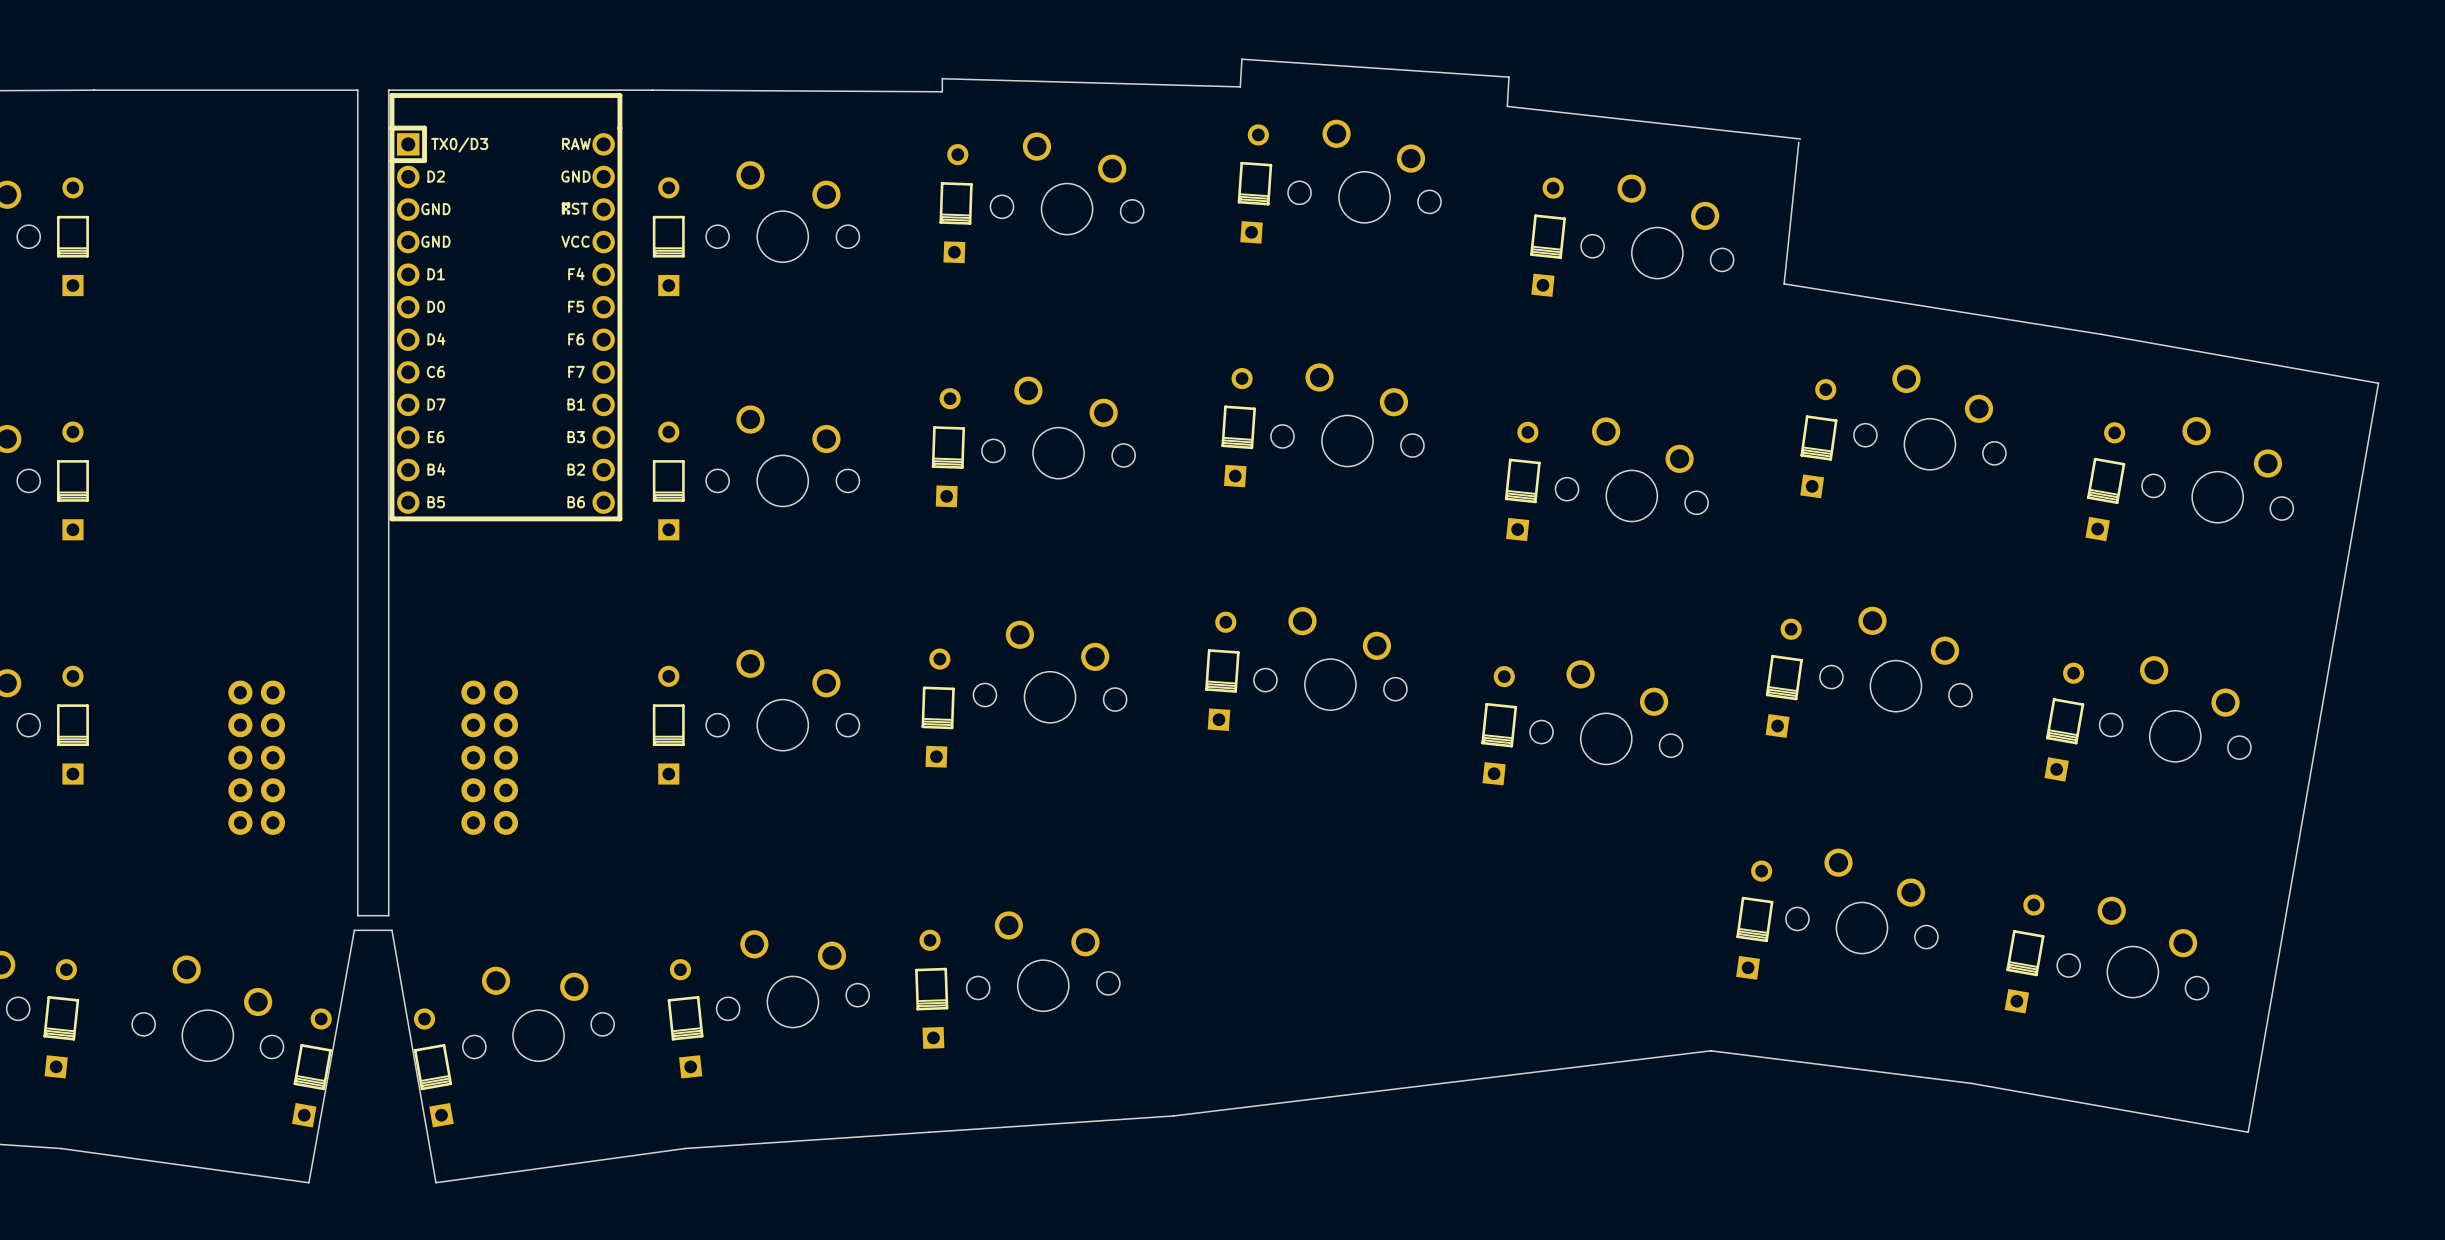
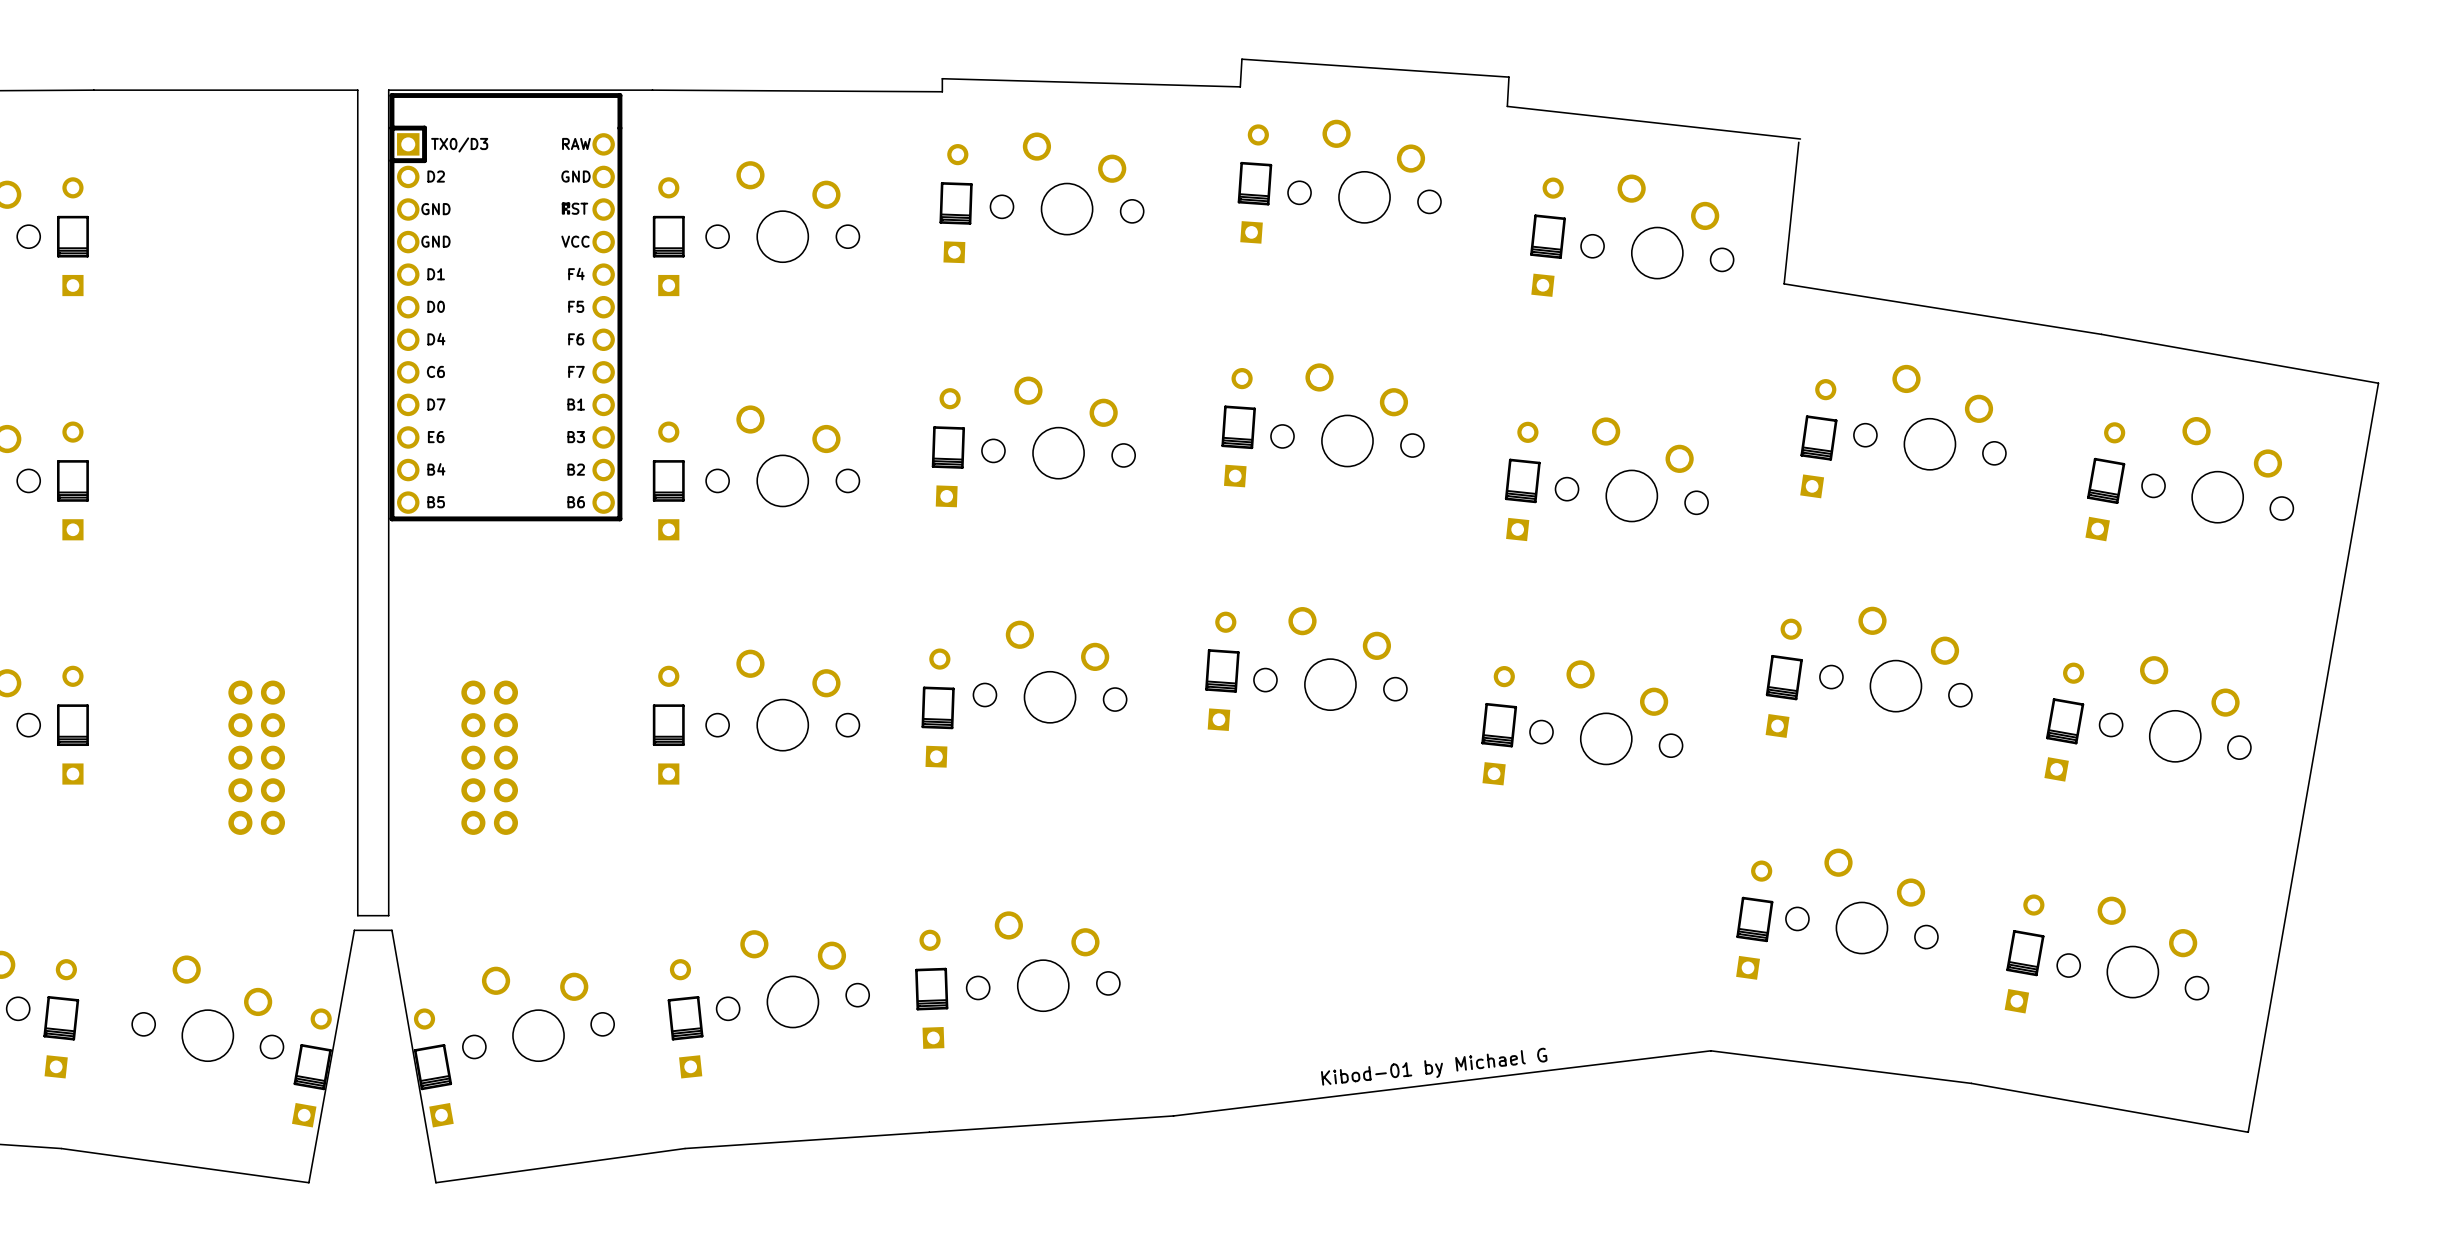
text: none -> Kibod-01 by Michael G (1434, 1066)

